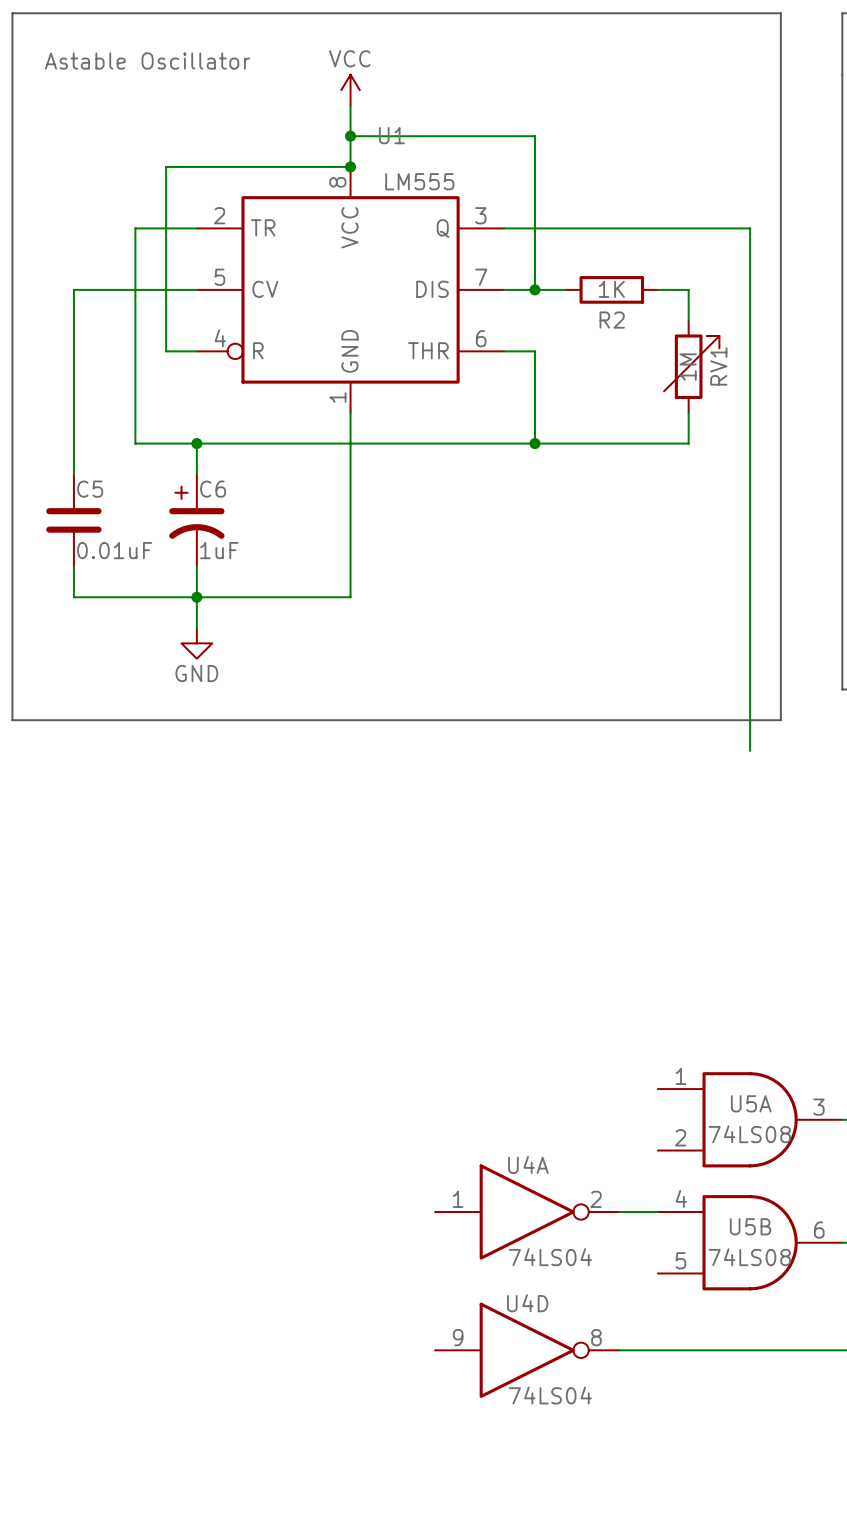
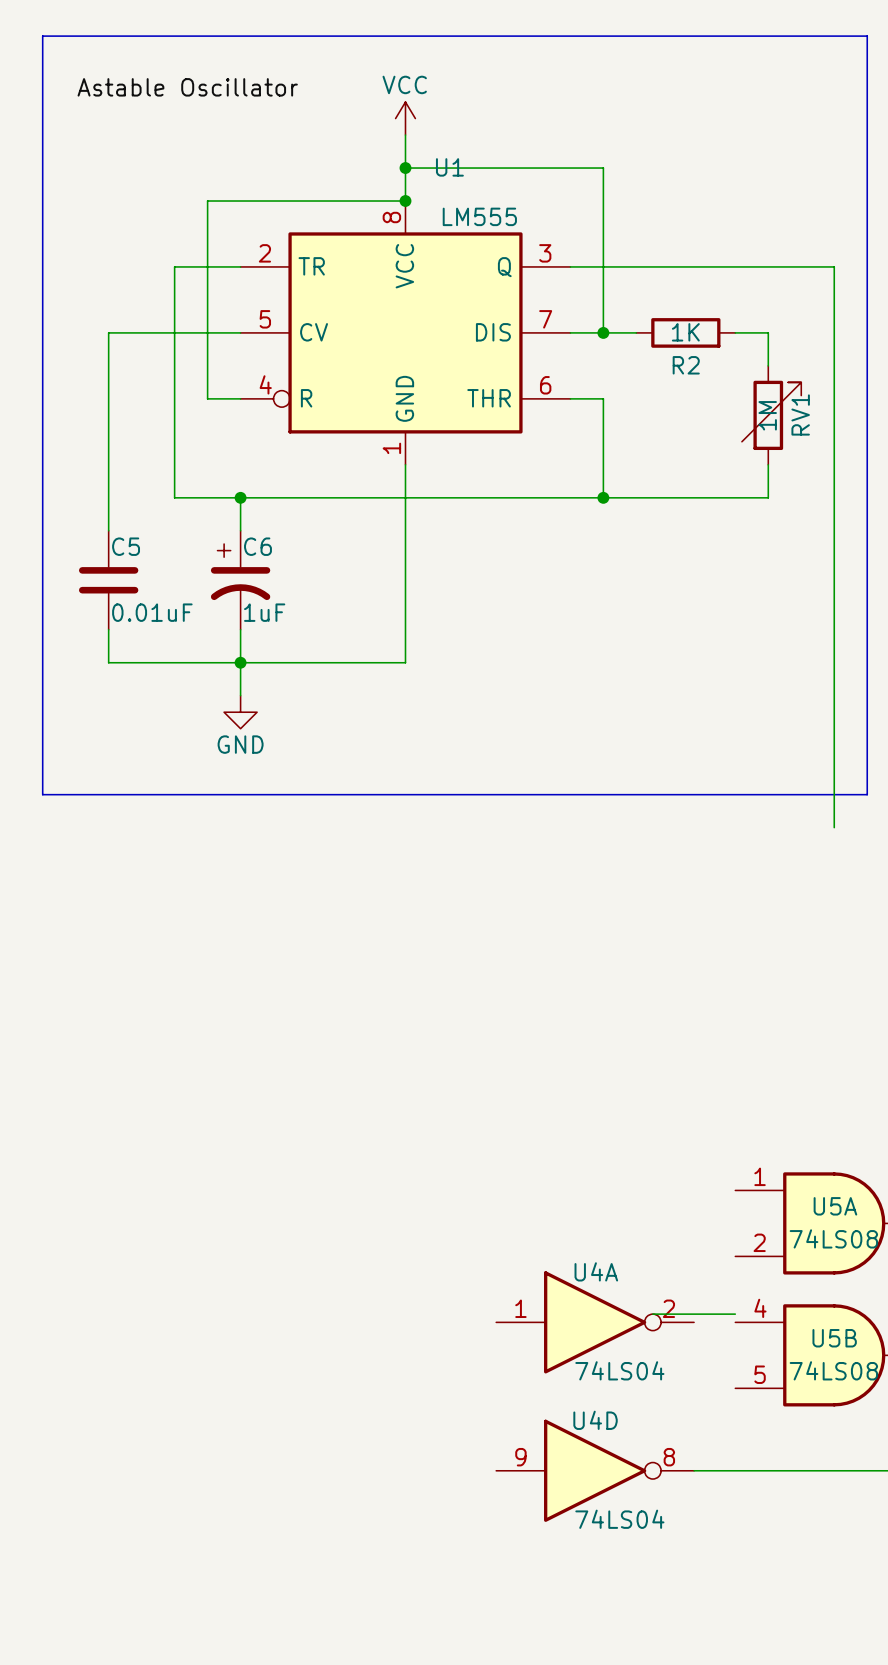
wire: none -> (652, 1314) (735, 1314)
wire: (619, 1212) (657, 1212) -> none

